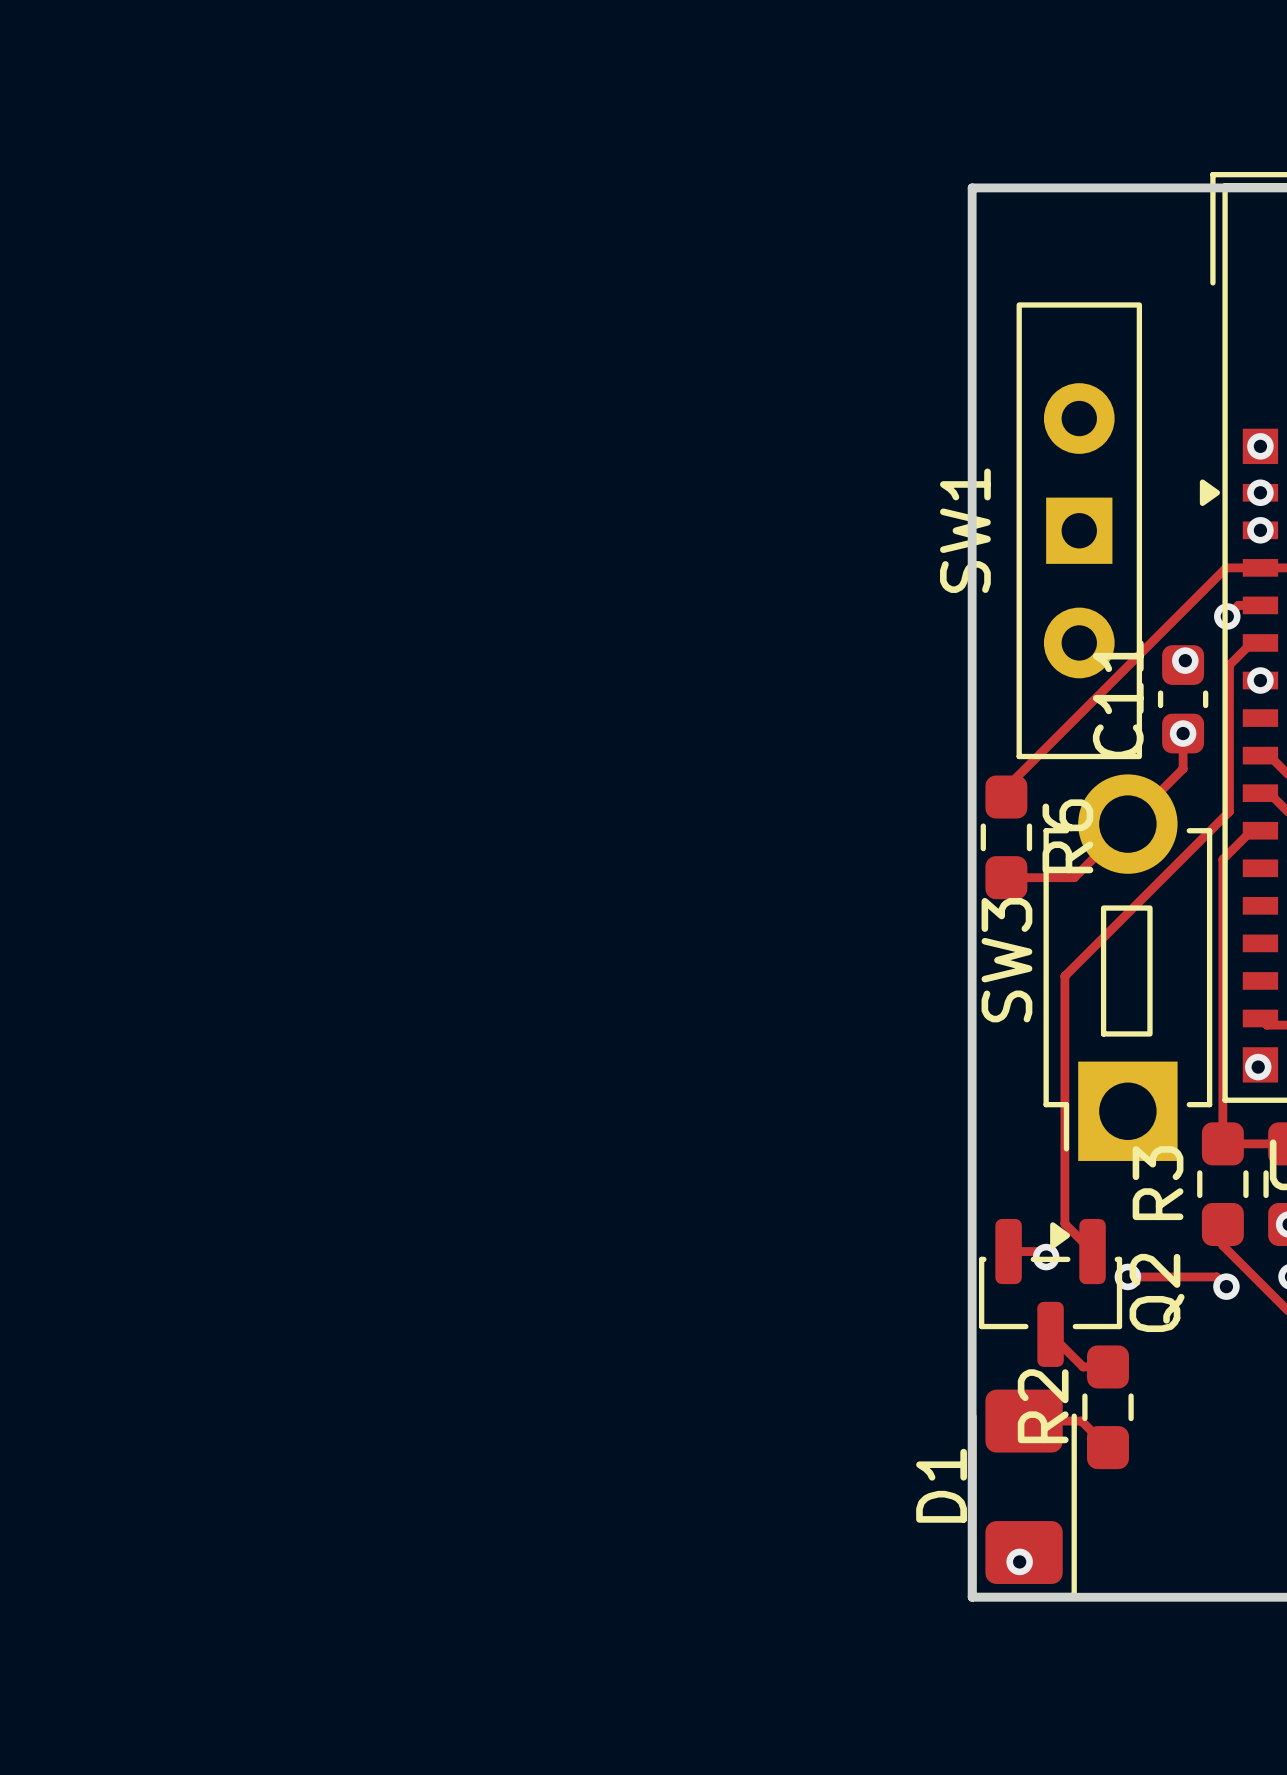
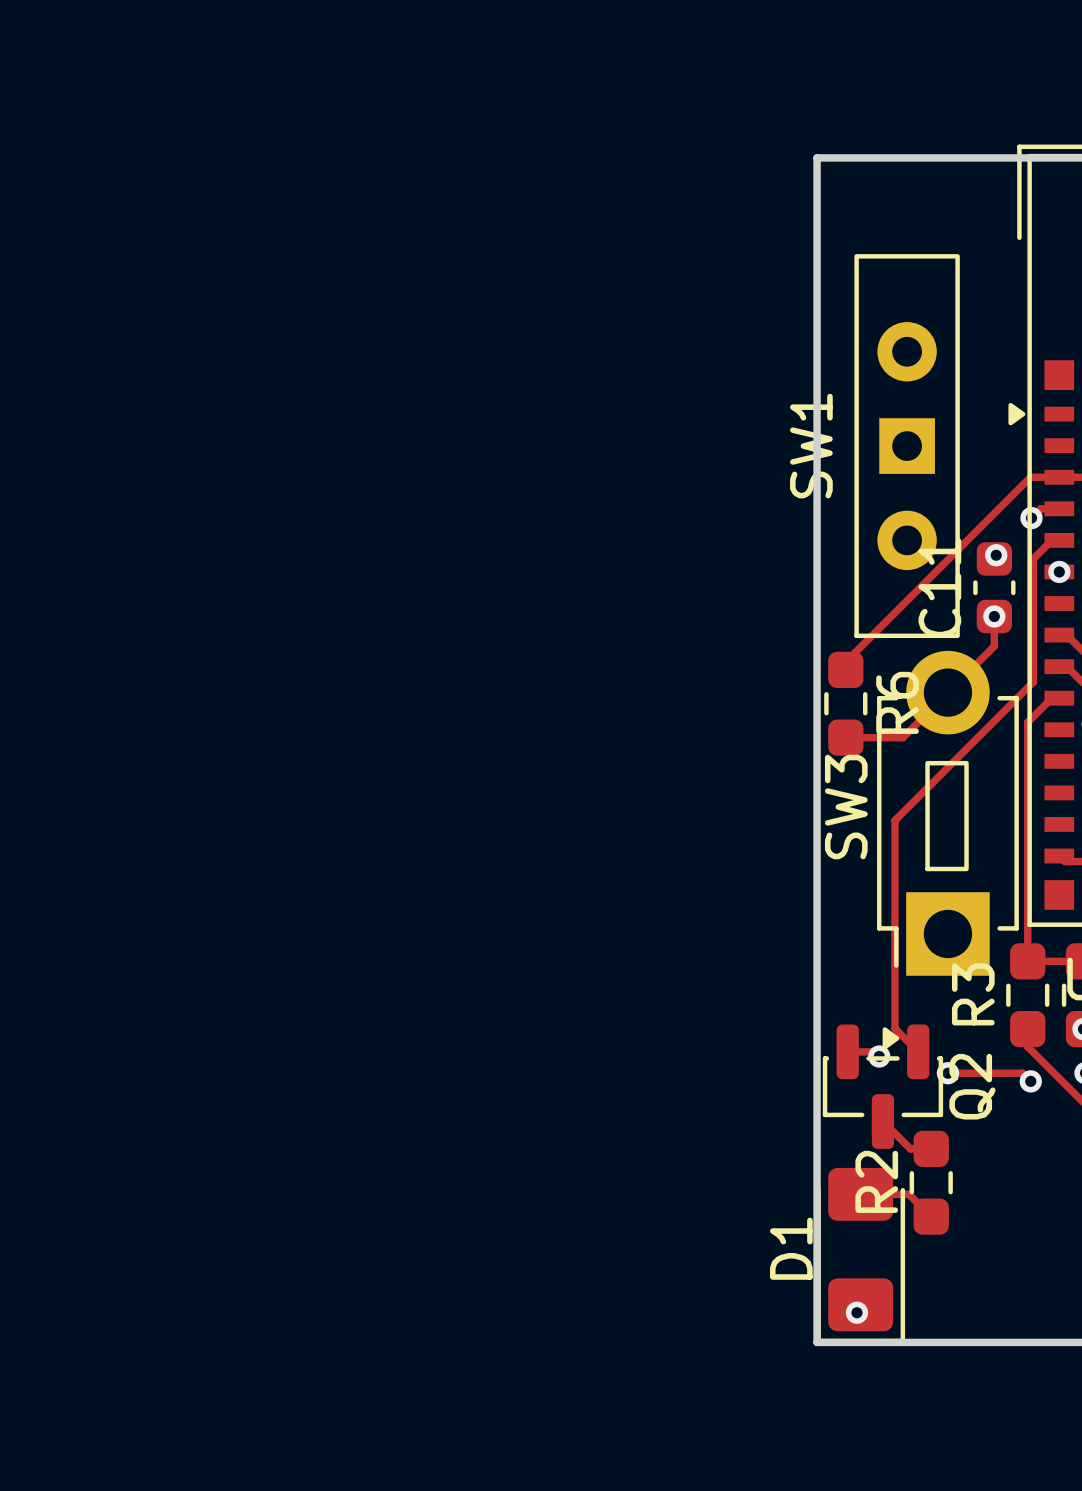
via: (1260, 446) -> none
via: (1260, 492) -> none
via: (1260, 530) -> none
via: (1258, 1067) -> none

